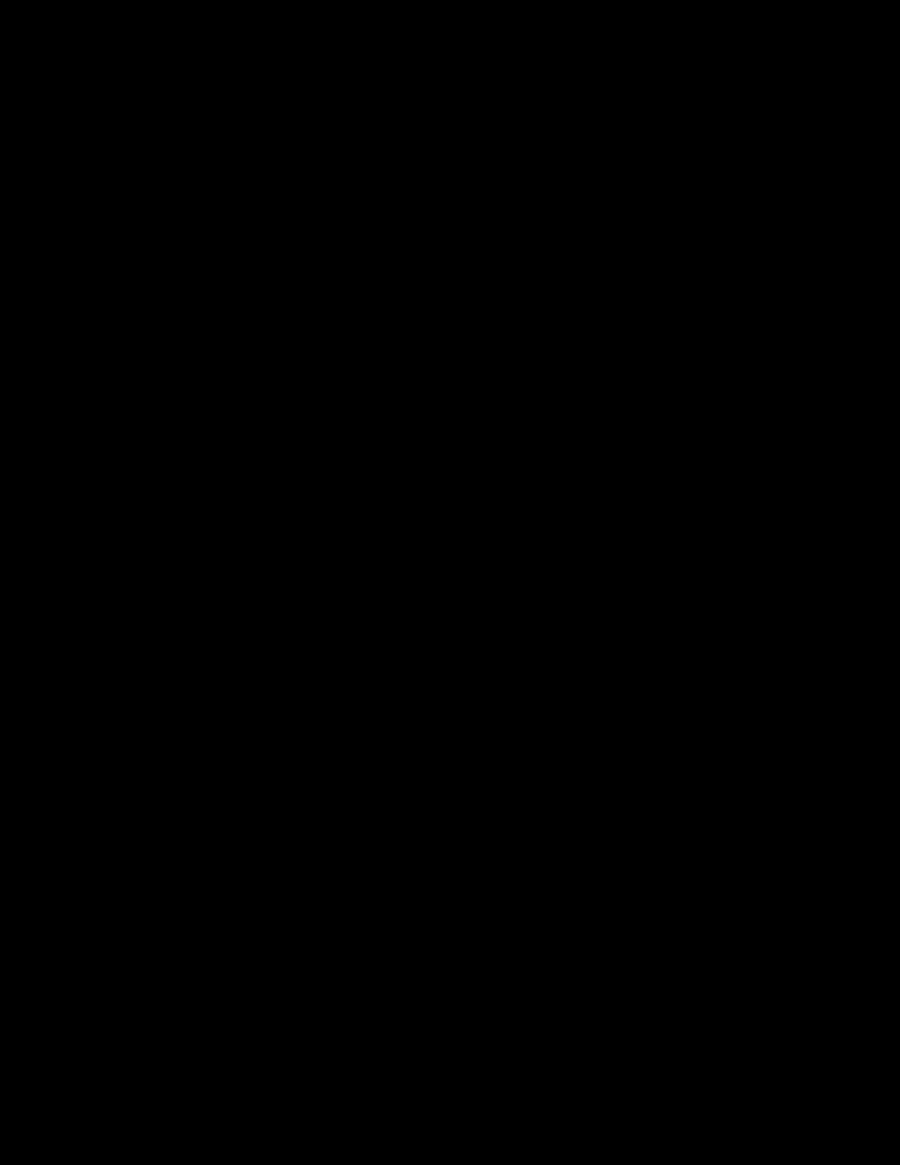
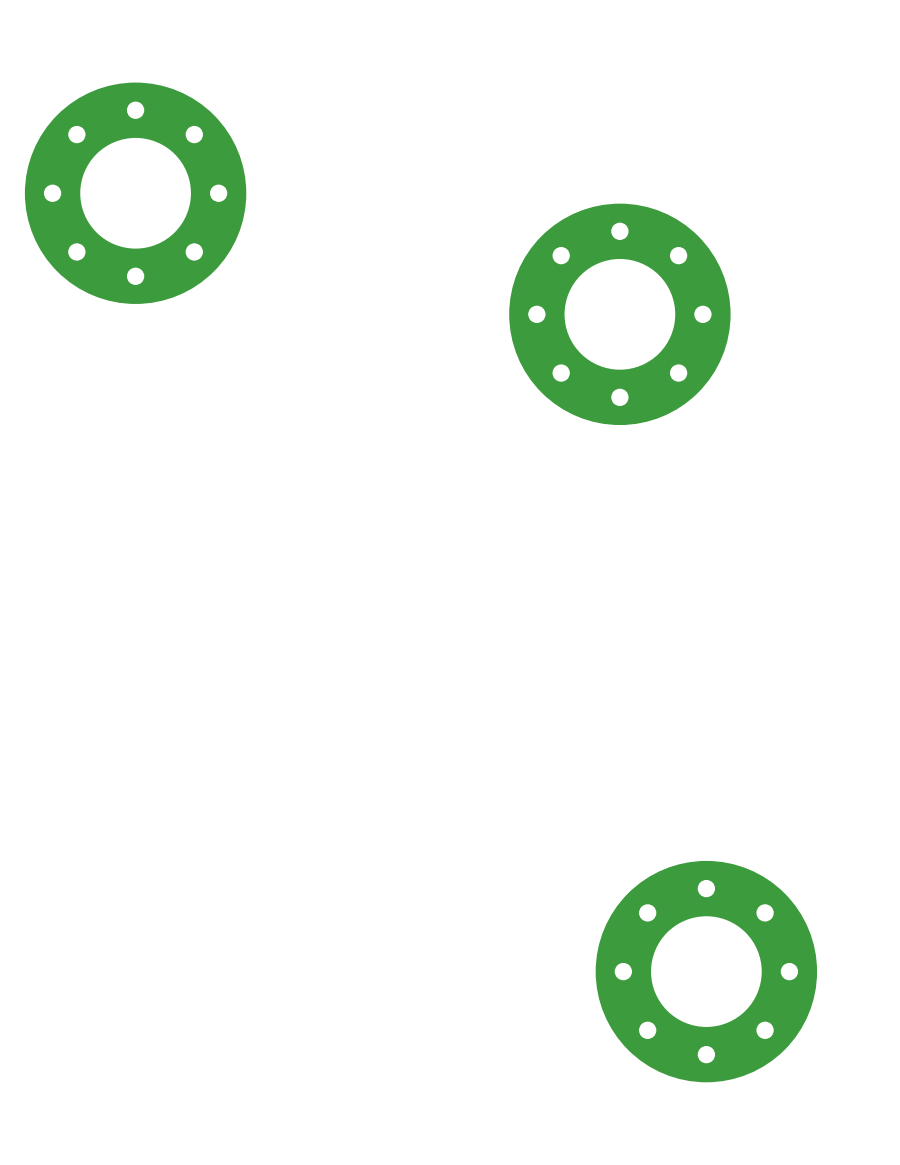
part: none -> (135, 193)
part: none -> (619, 314)
part: none -> (706, 971)

